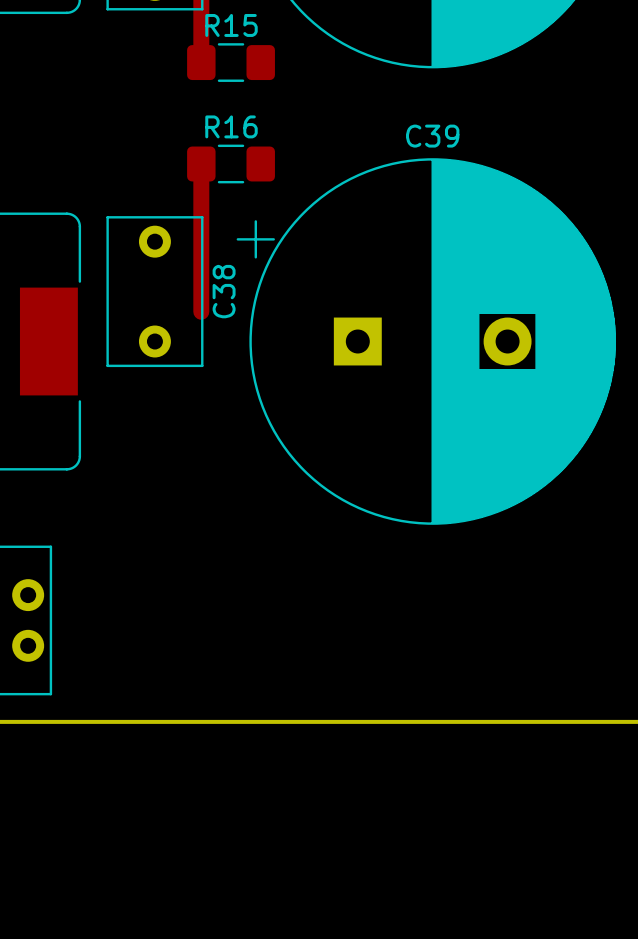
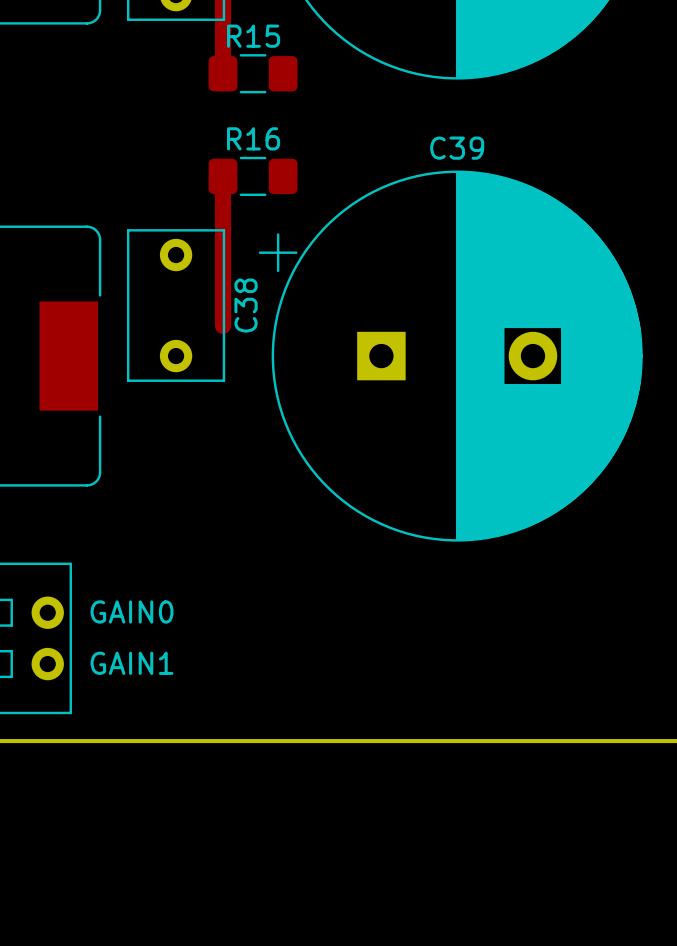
text: none -> GAIN0 (132, 611)
text: none -> GAIN1 (132, 663)

